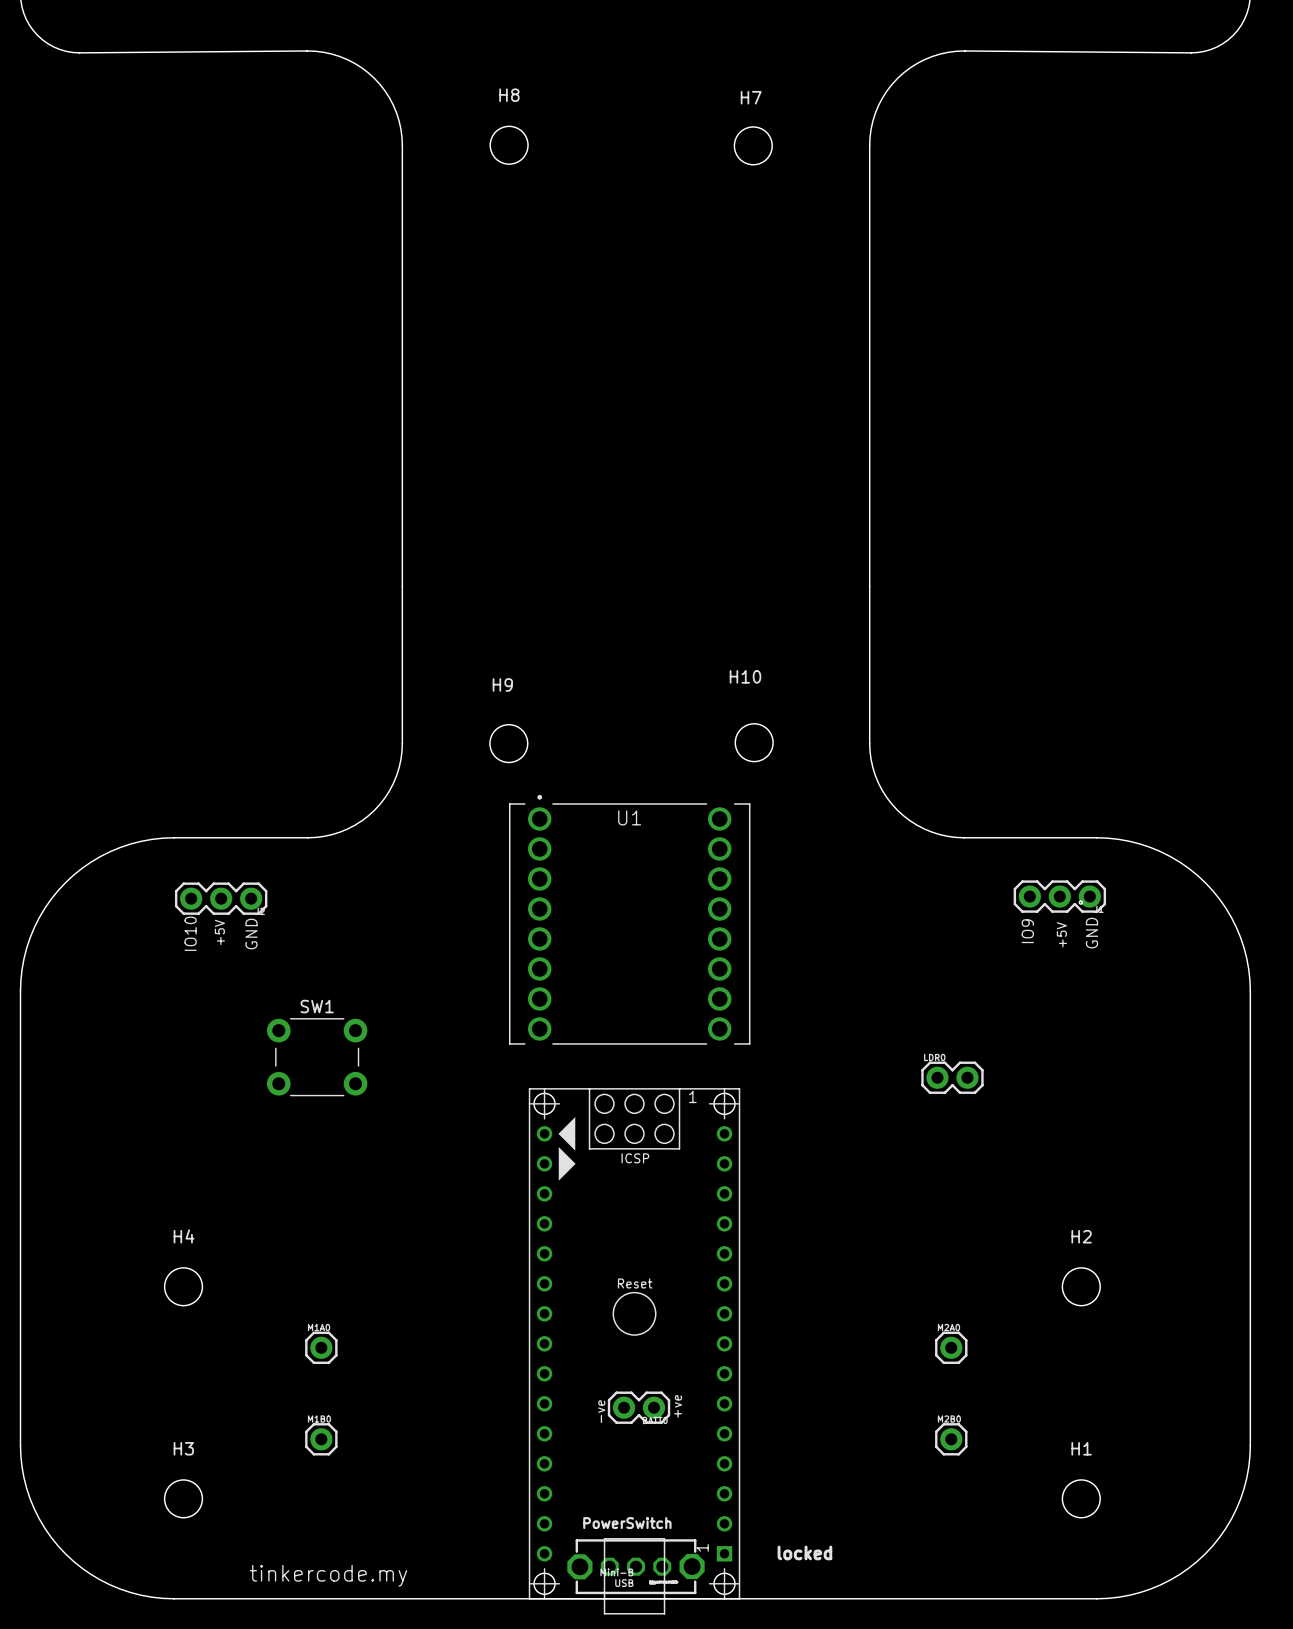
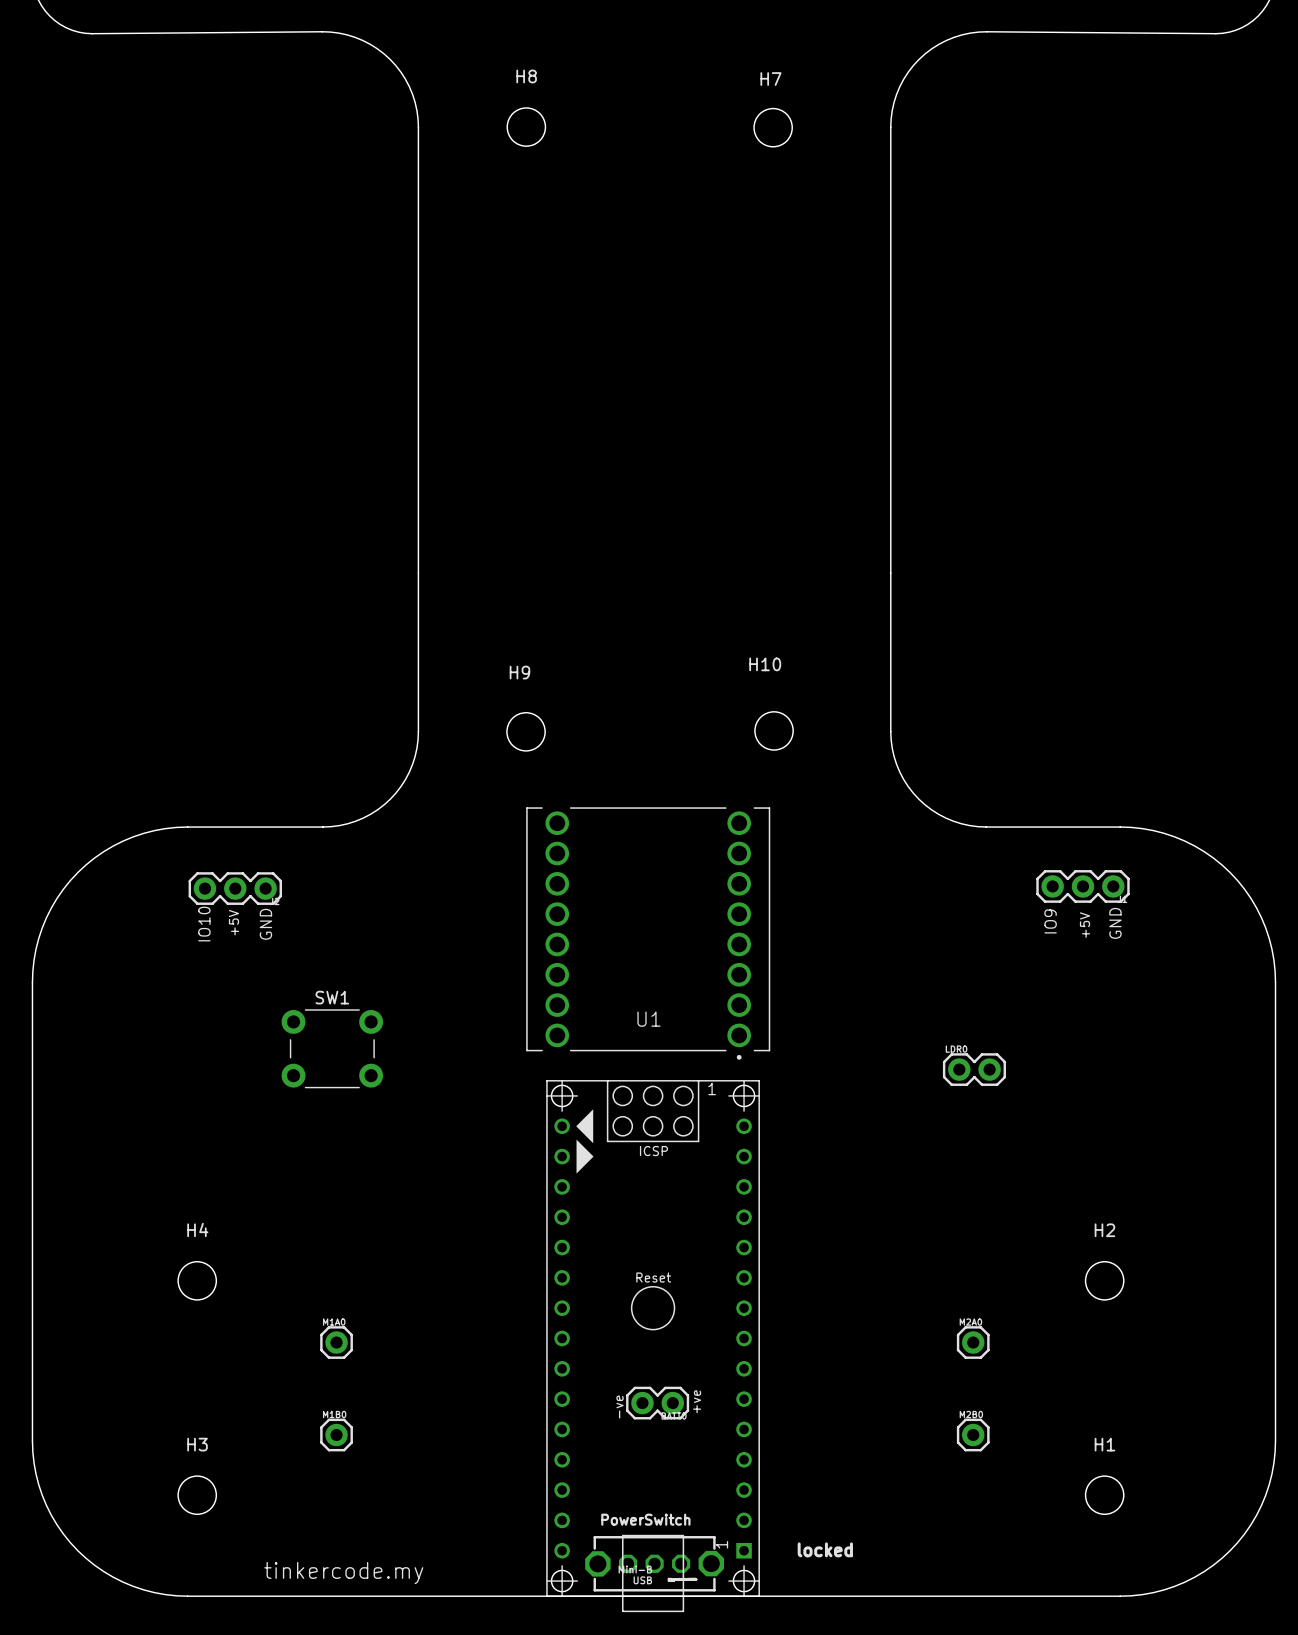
round board edge: [1079, 900, 1083, 905] -> none
U1 rotation: 0° (629, 919) -> 180° (648, 933)

